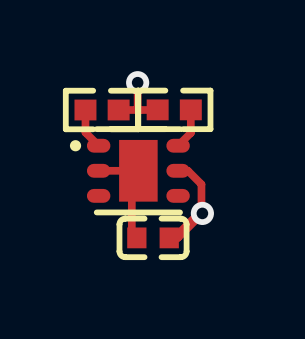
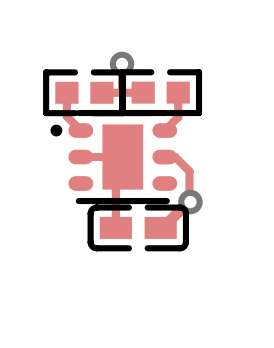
part footprint: [116, 215, 190, 261] -> [87, 204, 190, 252]

